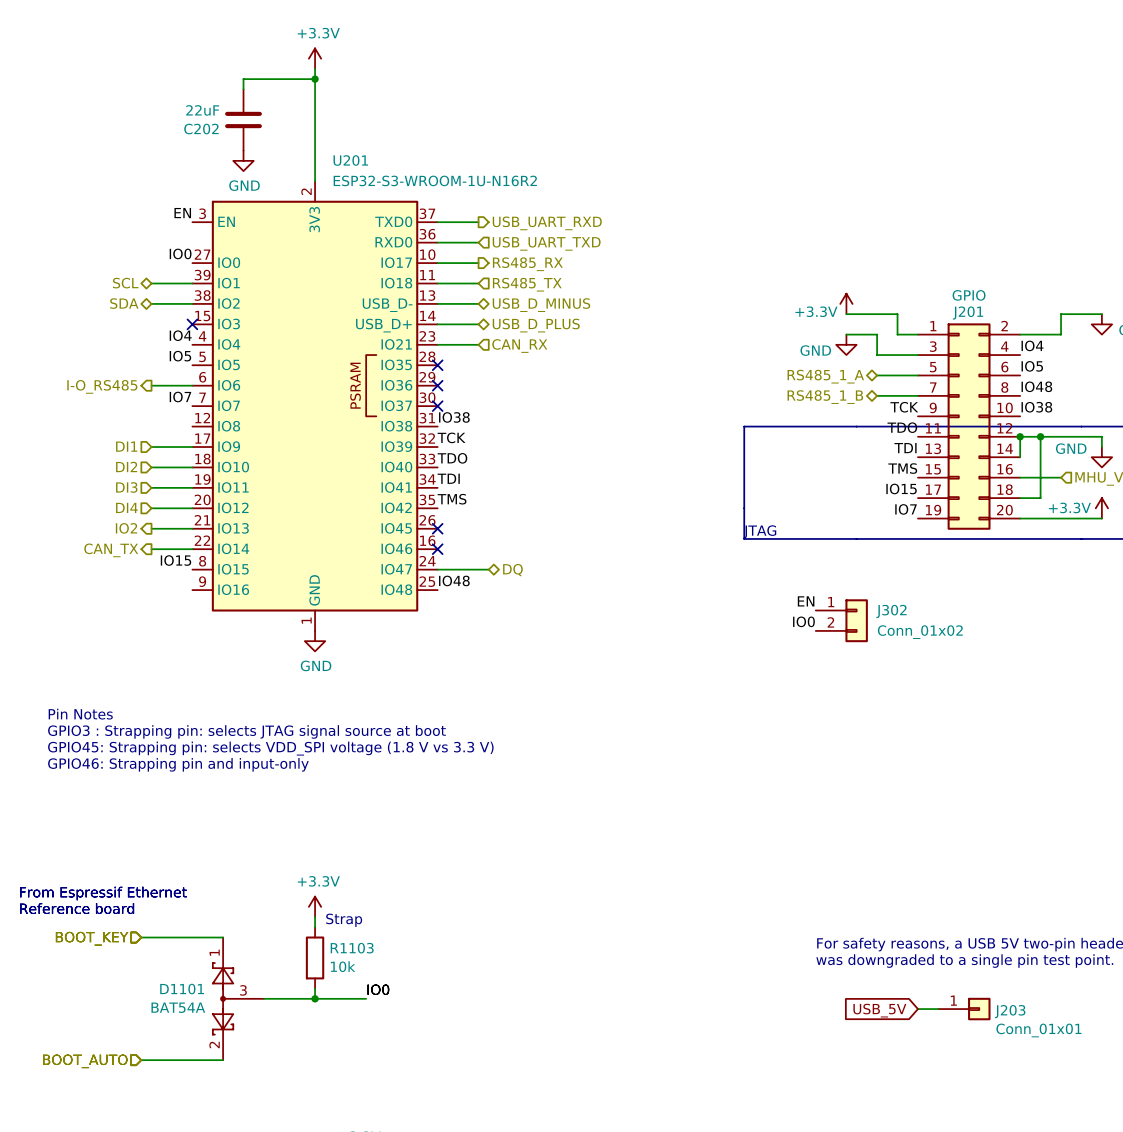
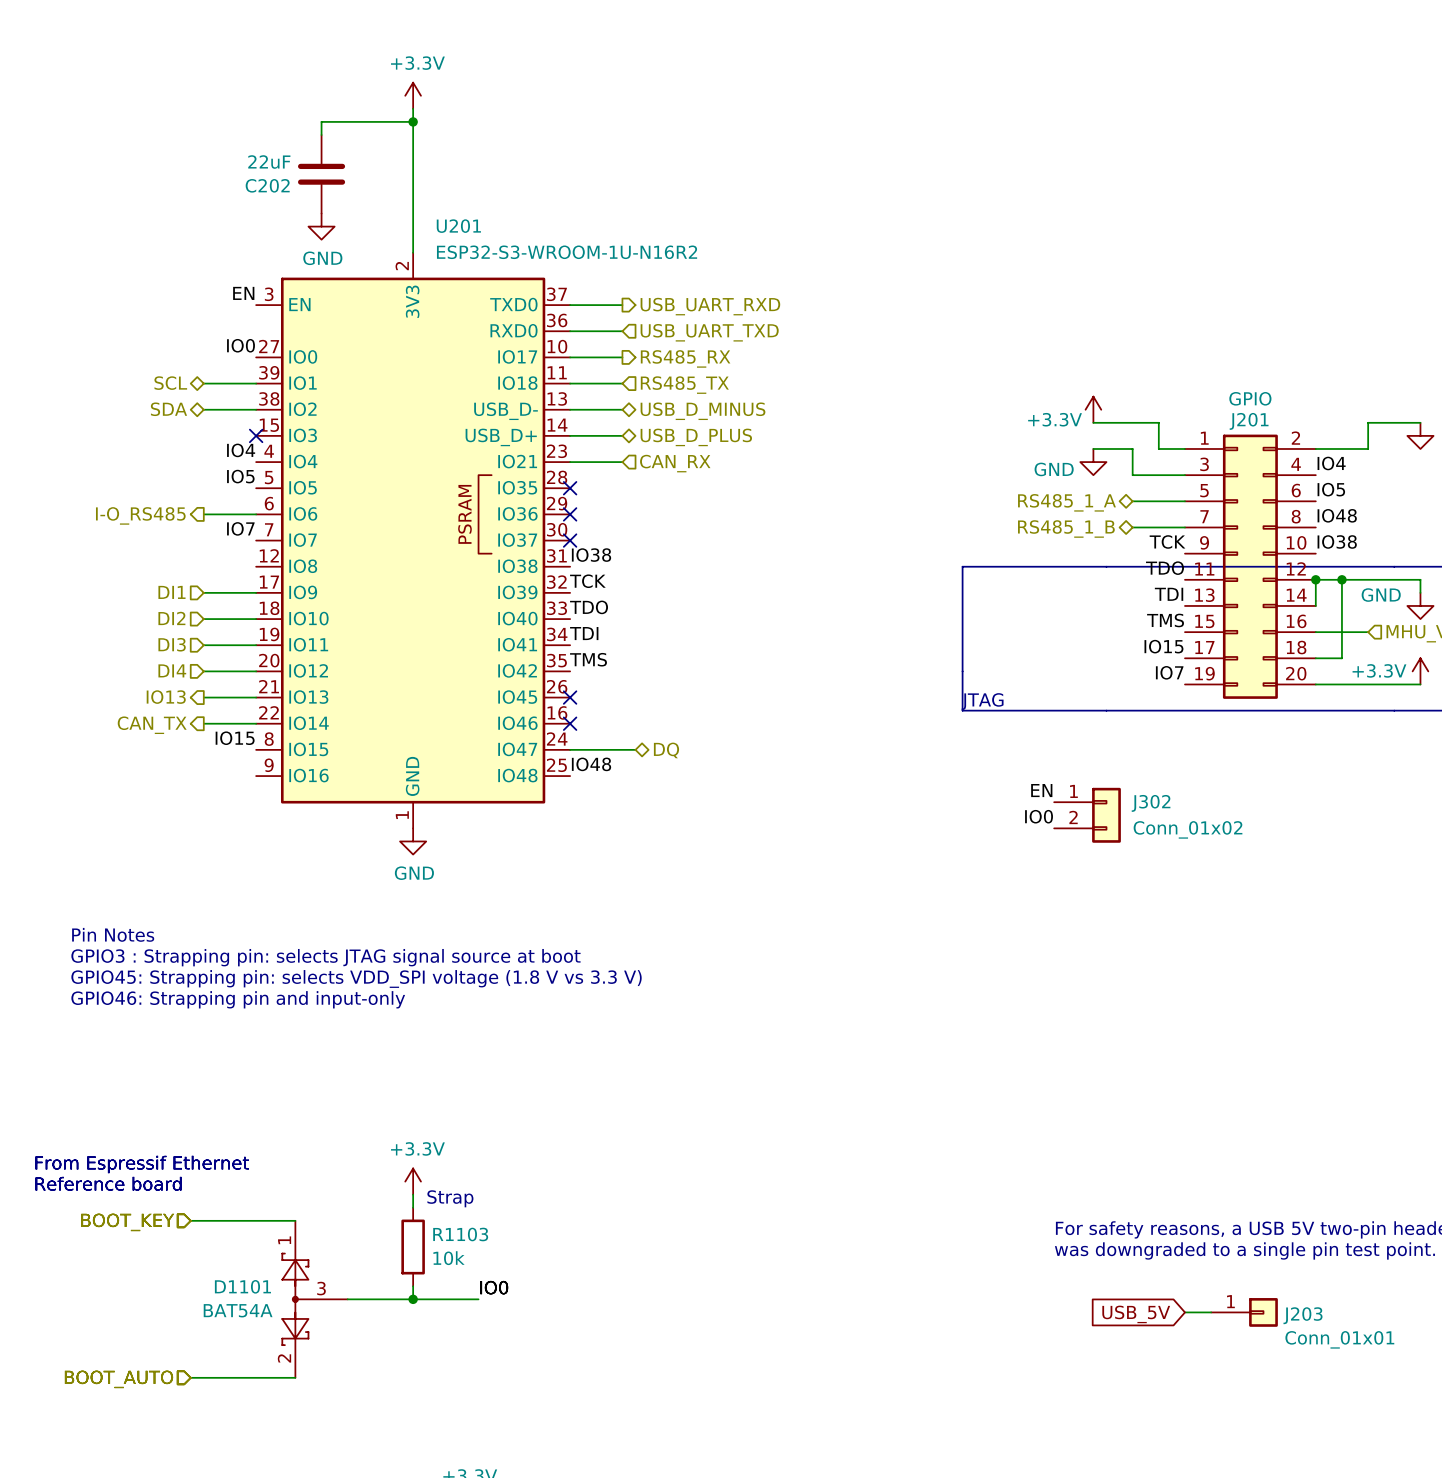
hierarchical label: IO2 (126, 528) -> IO13 (166, 697)

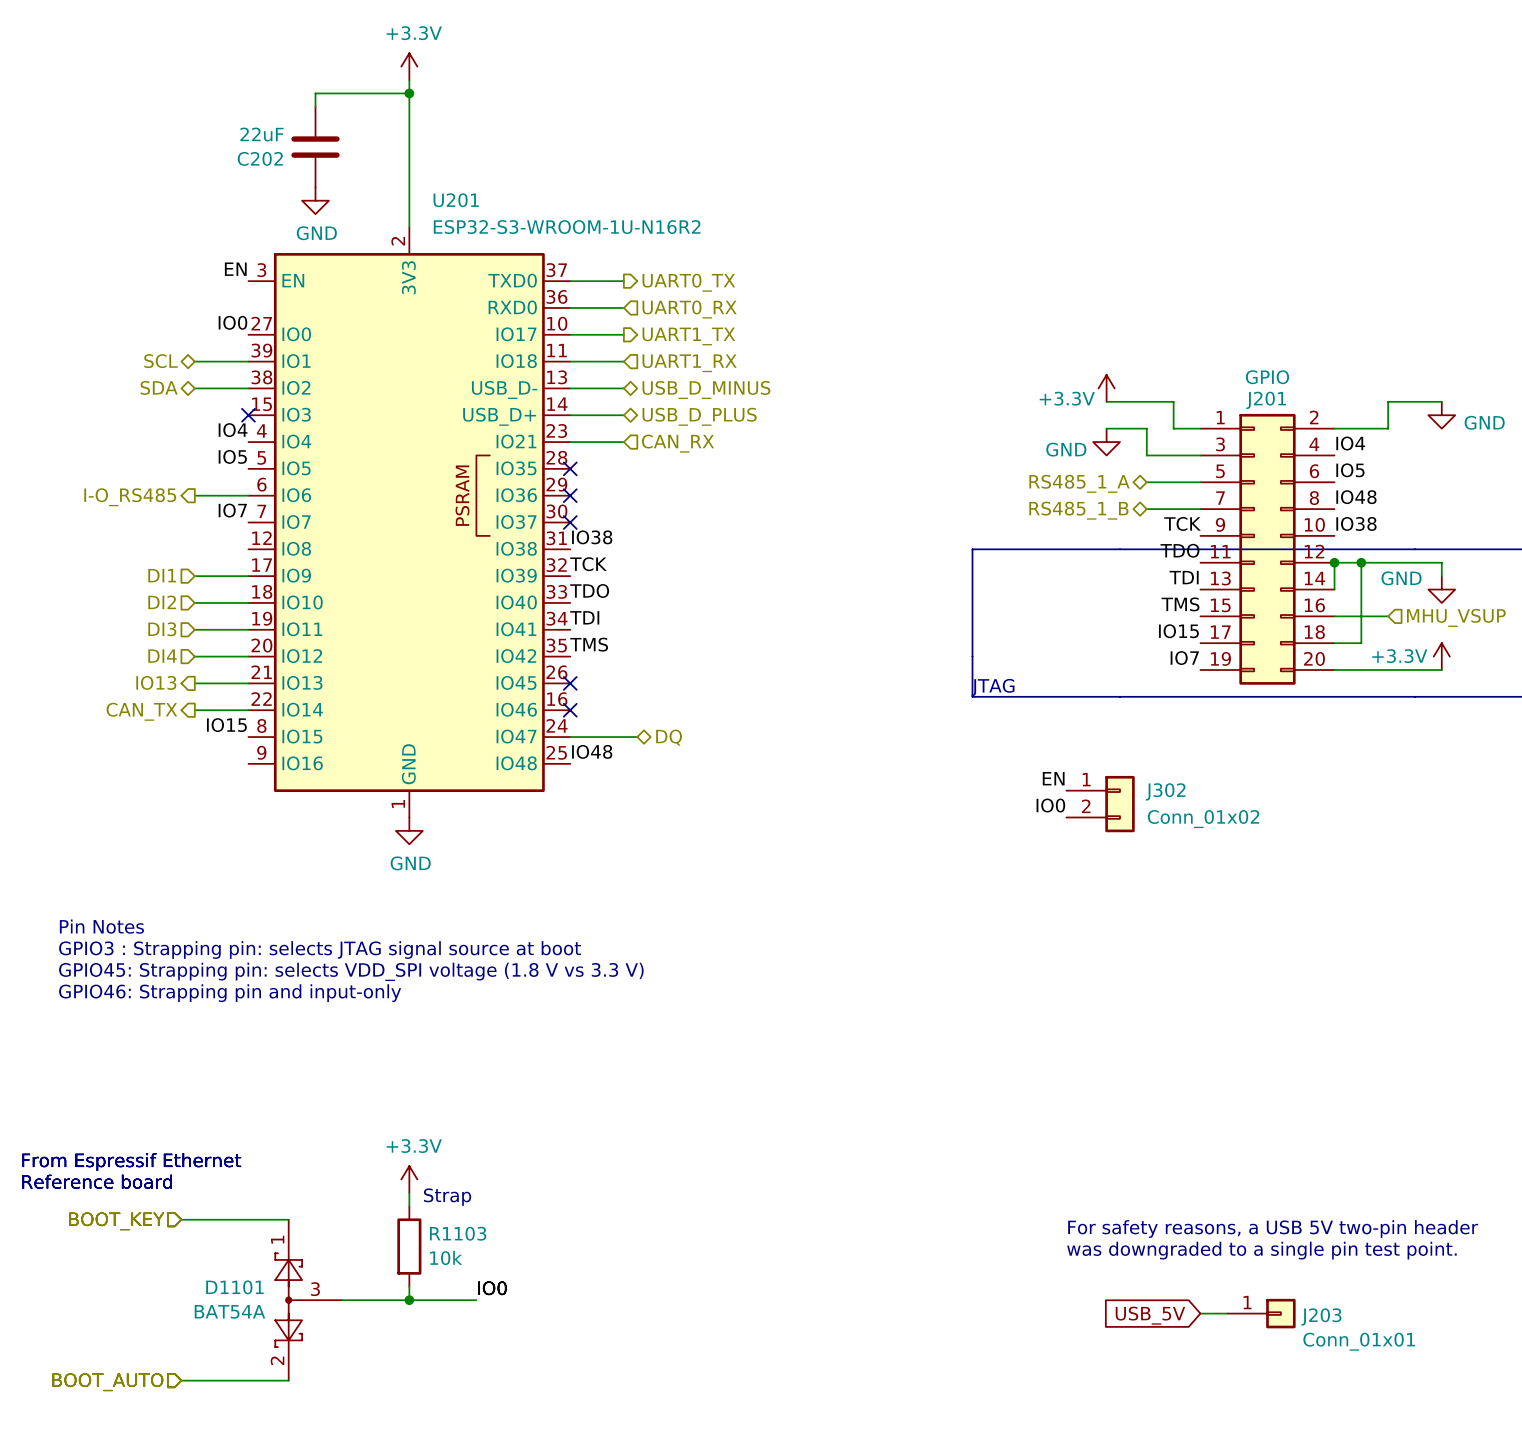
hierarchical label: USB_UART_RXD (710, 306) -> UART0_TX (688, 282)
hierarchical label: USB_UART_TXD (709, 332) -> UART0_RX (689, 309)
hierarchical label: RS485_RX (685, 358) -> UART1_TX (688, 336)
hierarchical label: RS485_TX (684, 385) -> UART1_RX (689, 363)

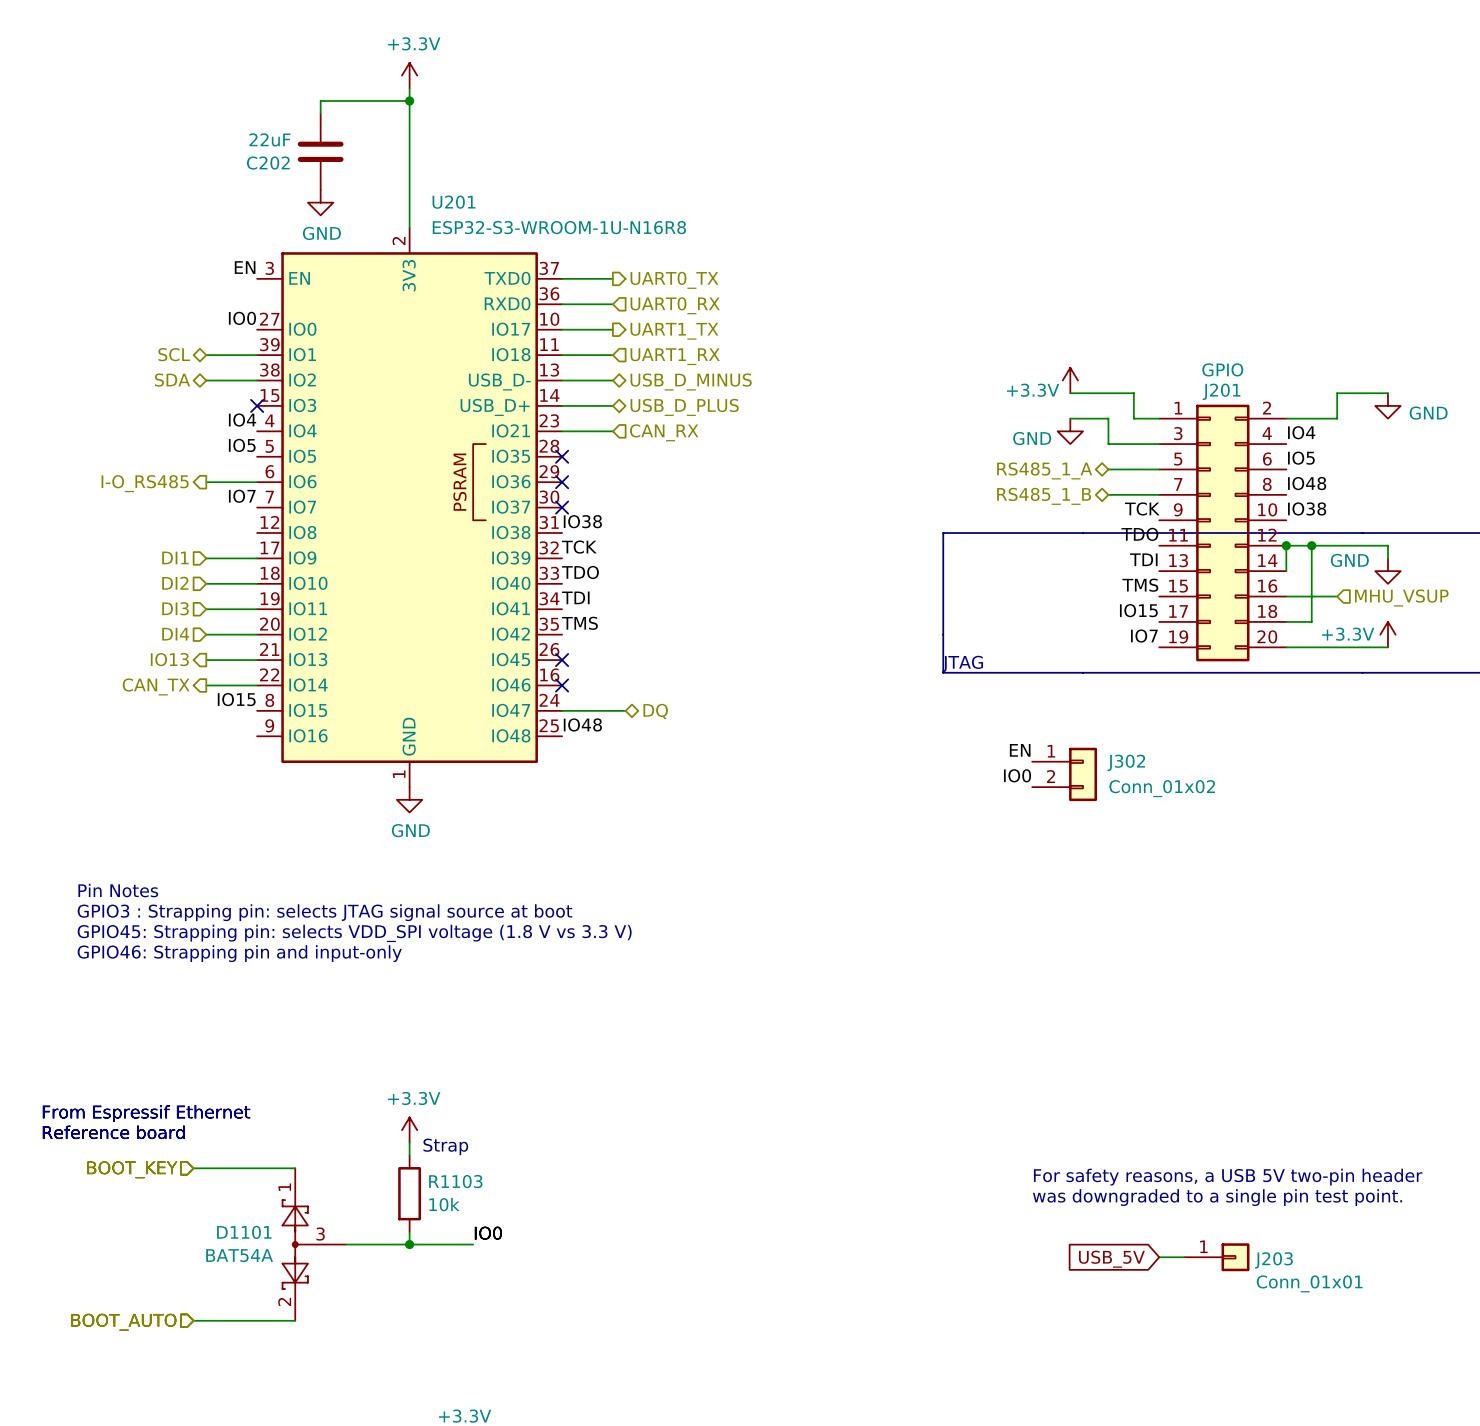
U201 value: ESP32-S3-WROOM-1U-N16R2 (567, 227) -> ESP32-S3-WROOM-1U-N16R8 (559, 227)

